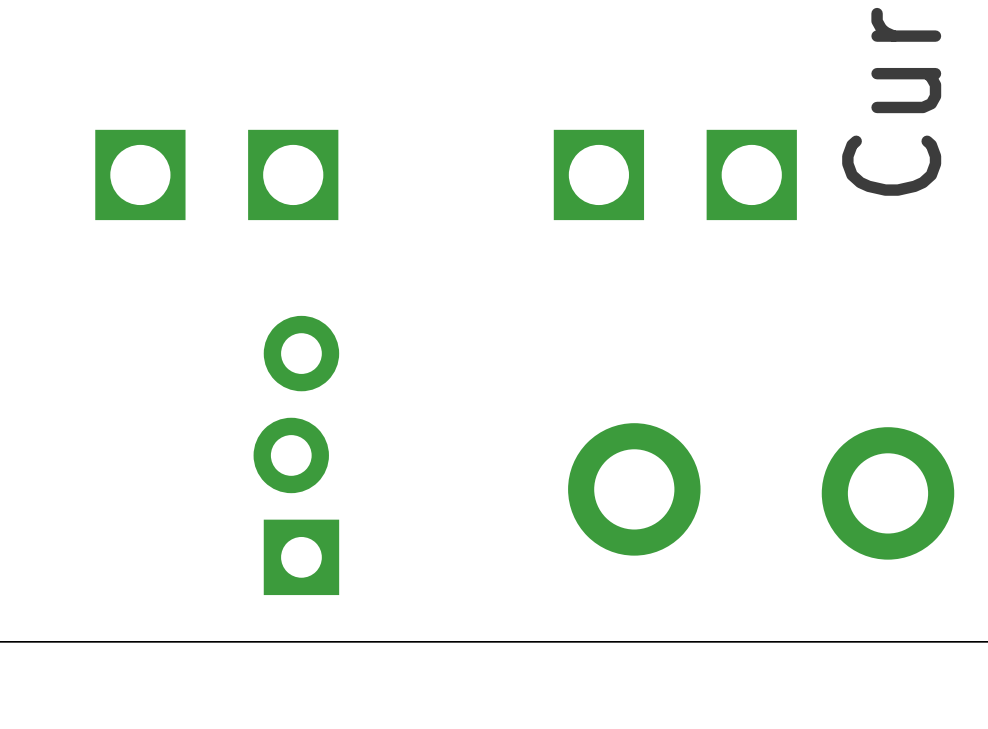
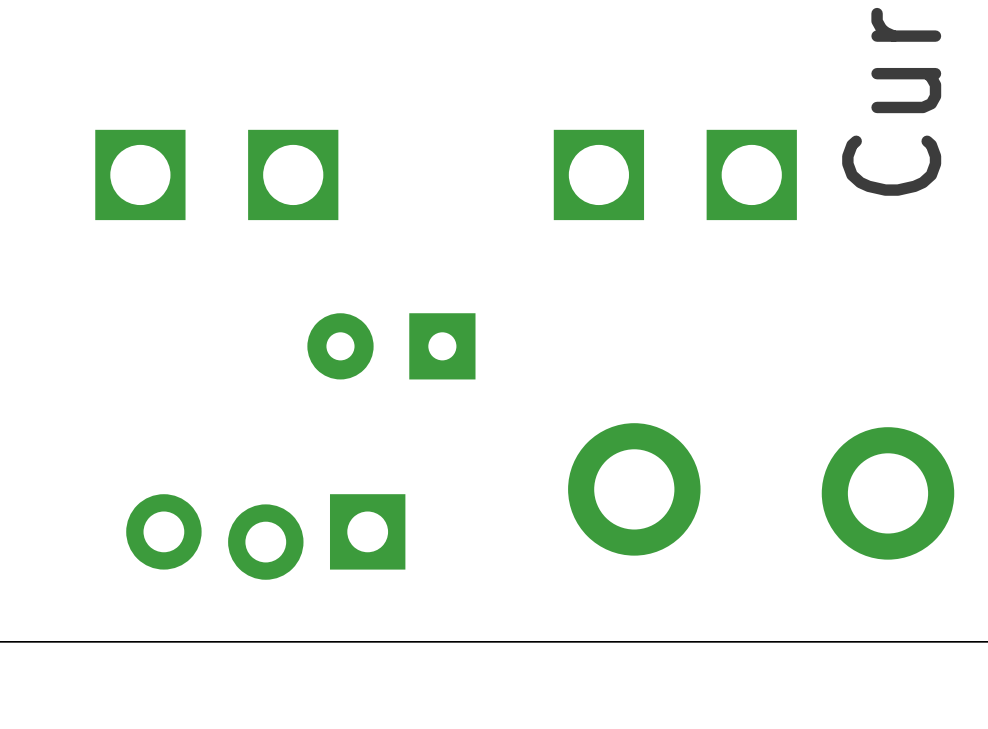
part: none -> (391, 346)
part rotation: 0° (296, 455) -> 90° counterclockwise (265, 536)

